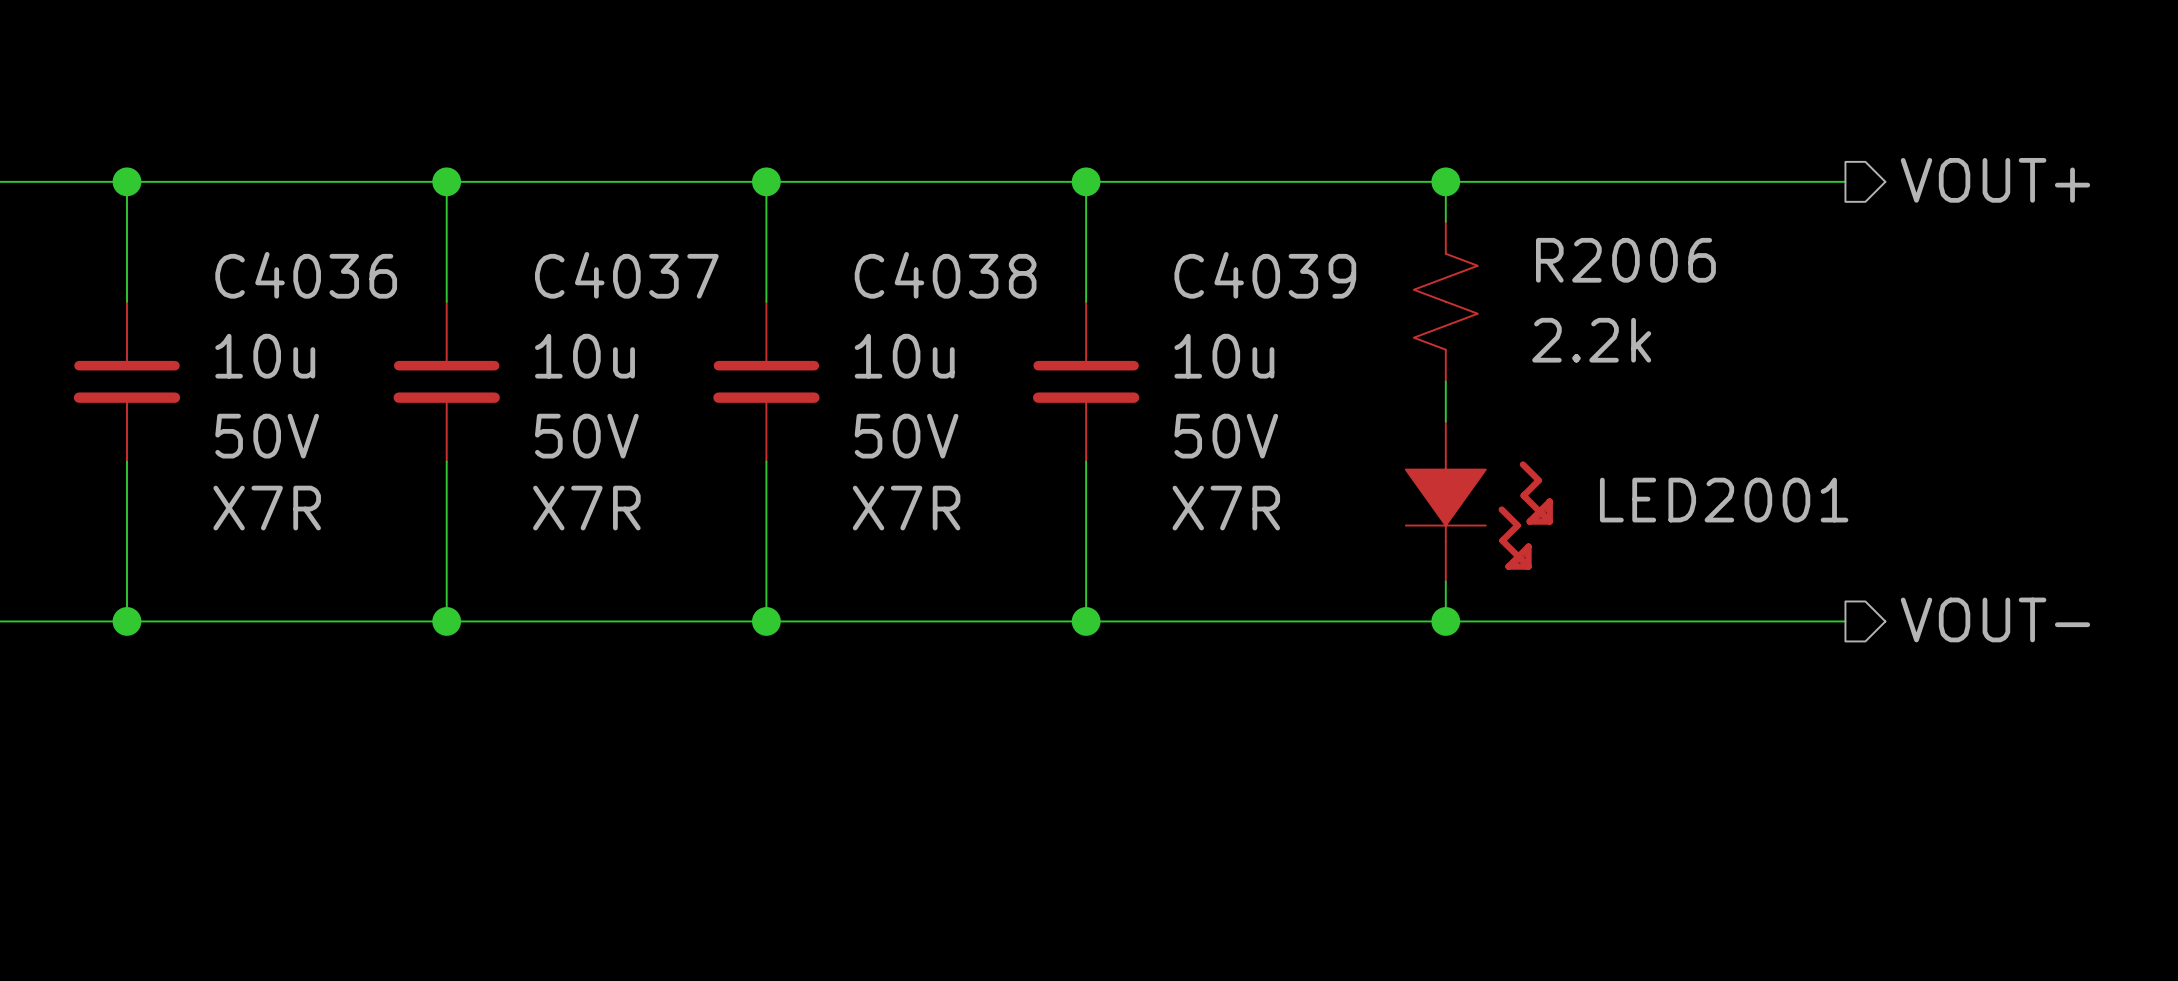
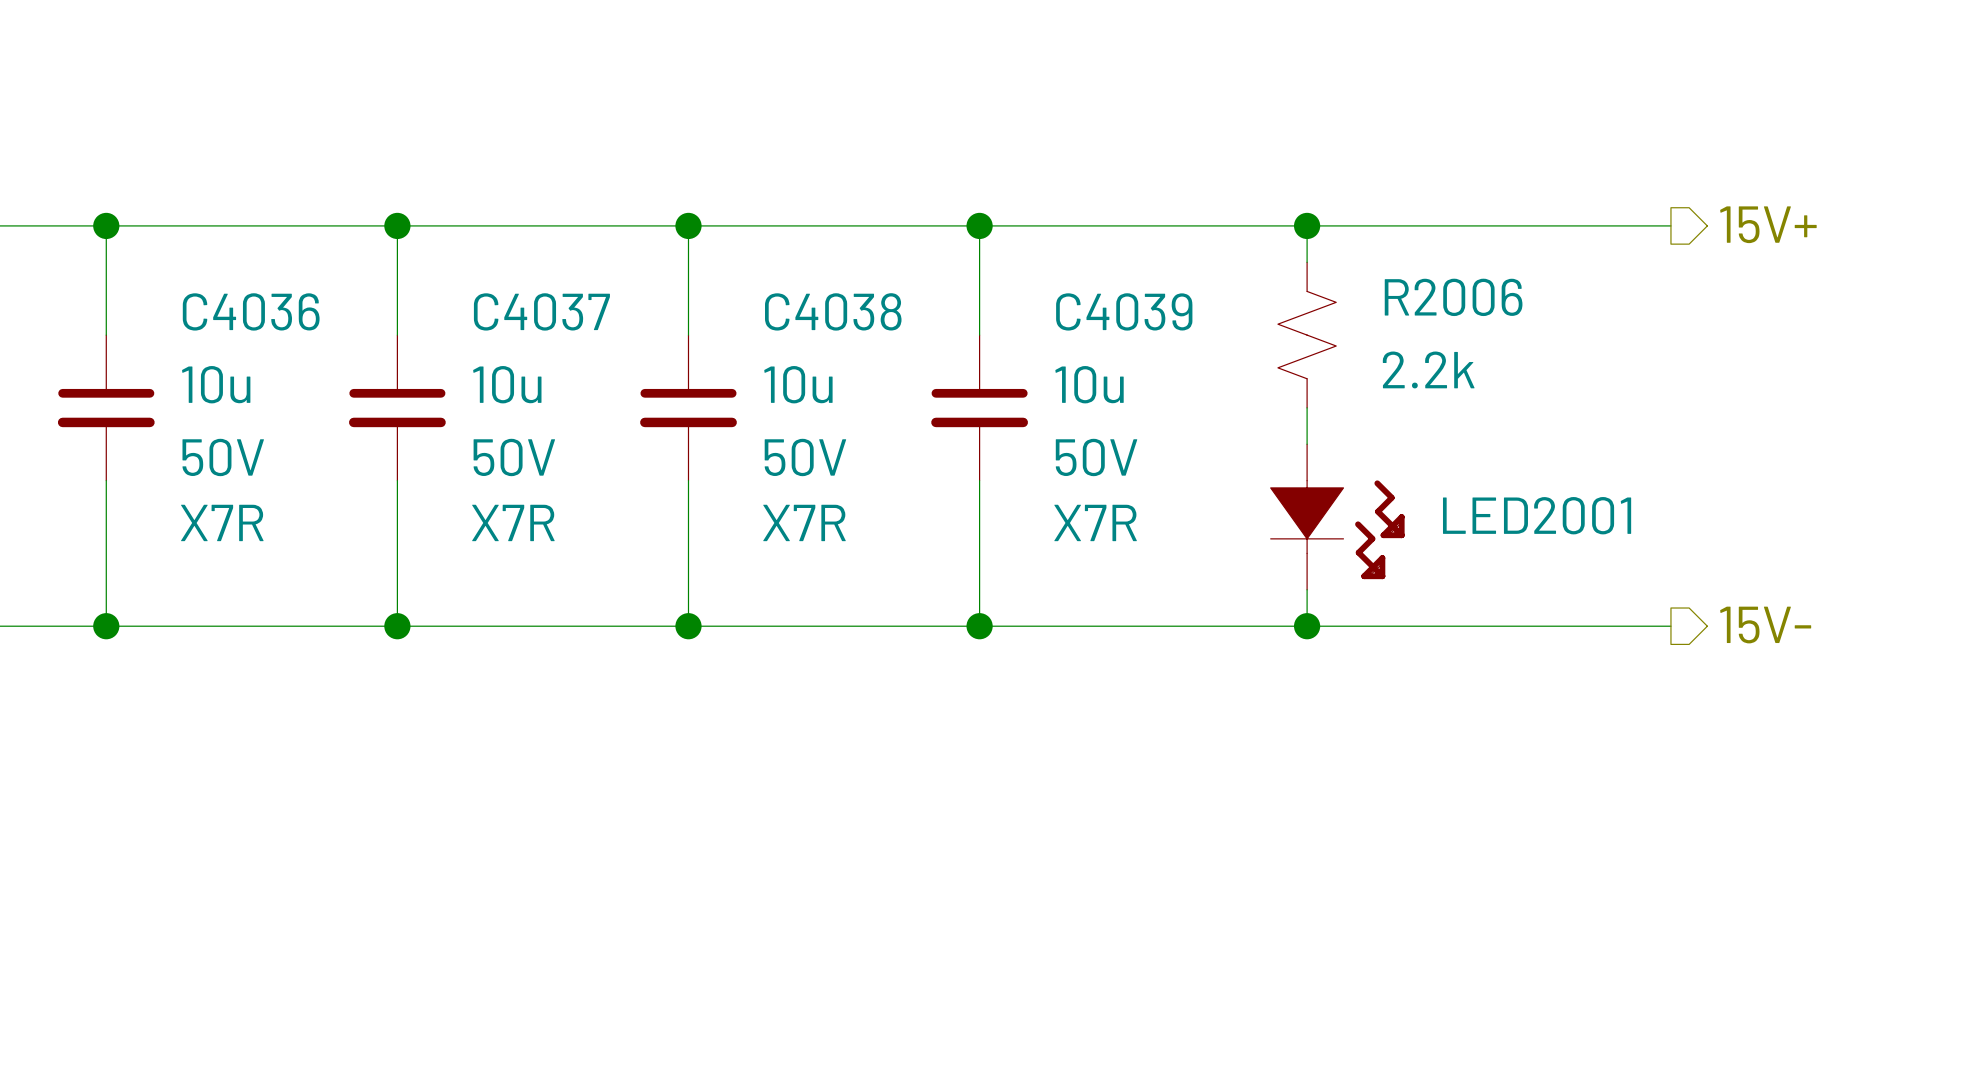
hierarchical label: VOUT+ (1995, 180) -> 15V+ (1768, 224)
hierarchical label: VOUT- (1995, 619) -> 15V- (1765, 625)

